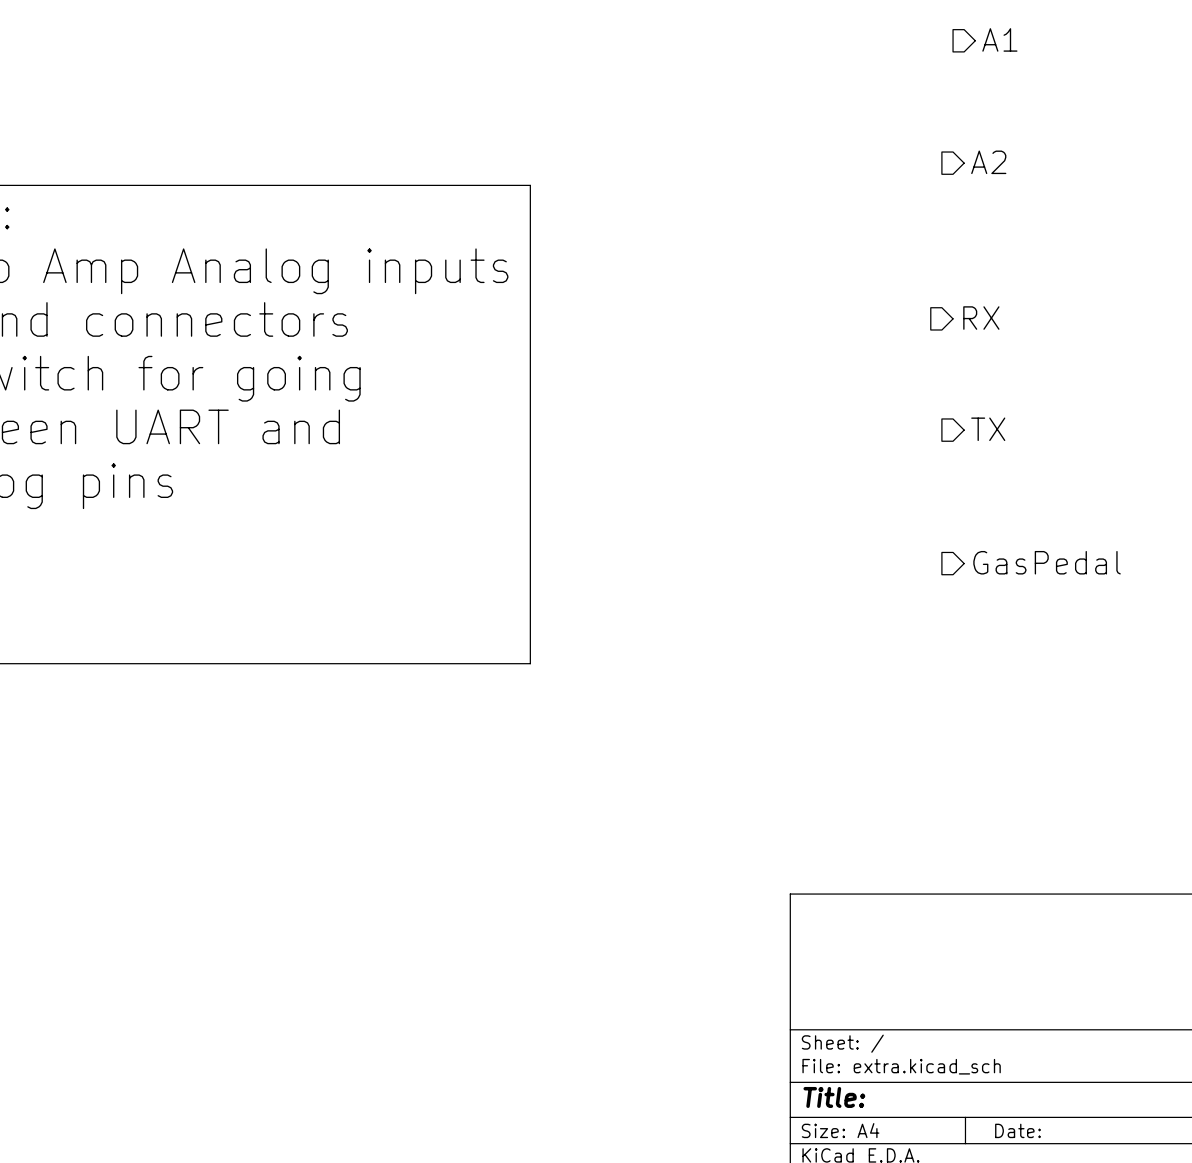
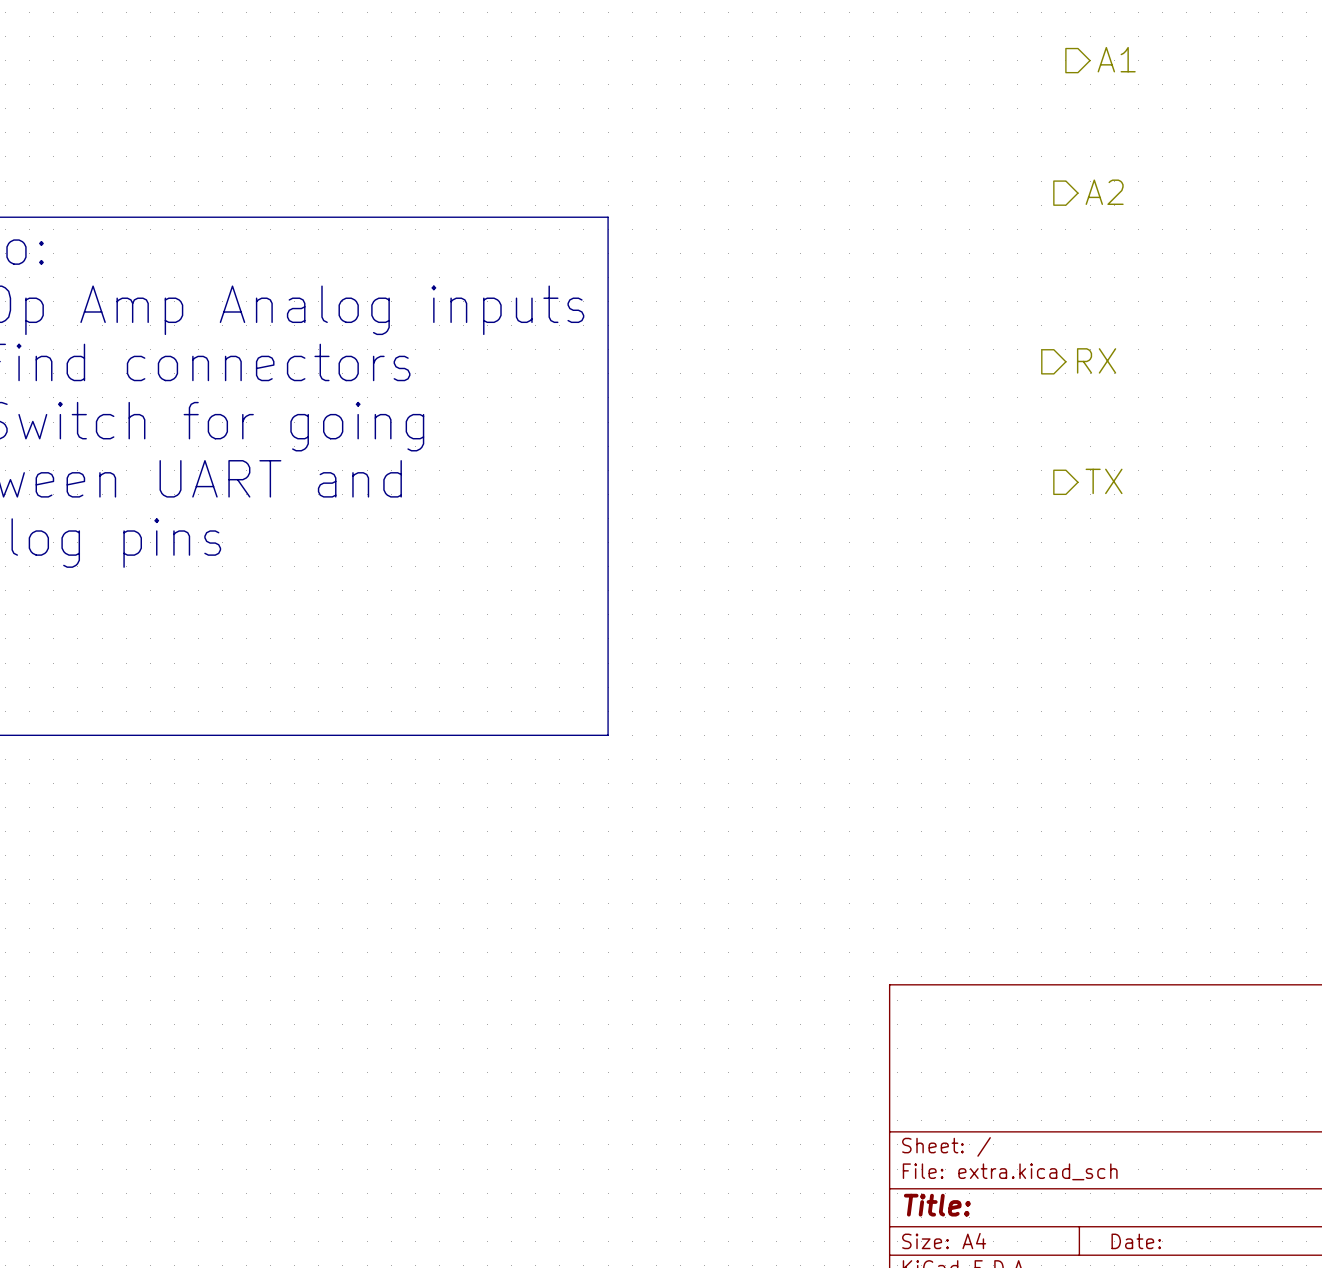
hierarchical label: GasPedal (1047, 562) -> none

